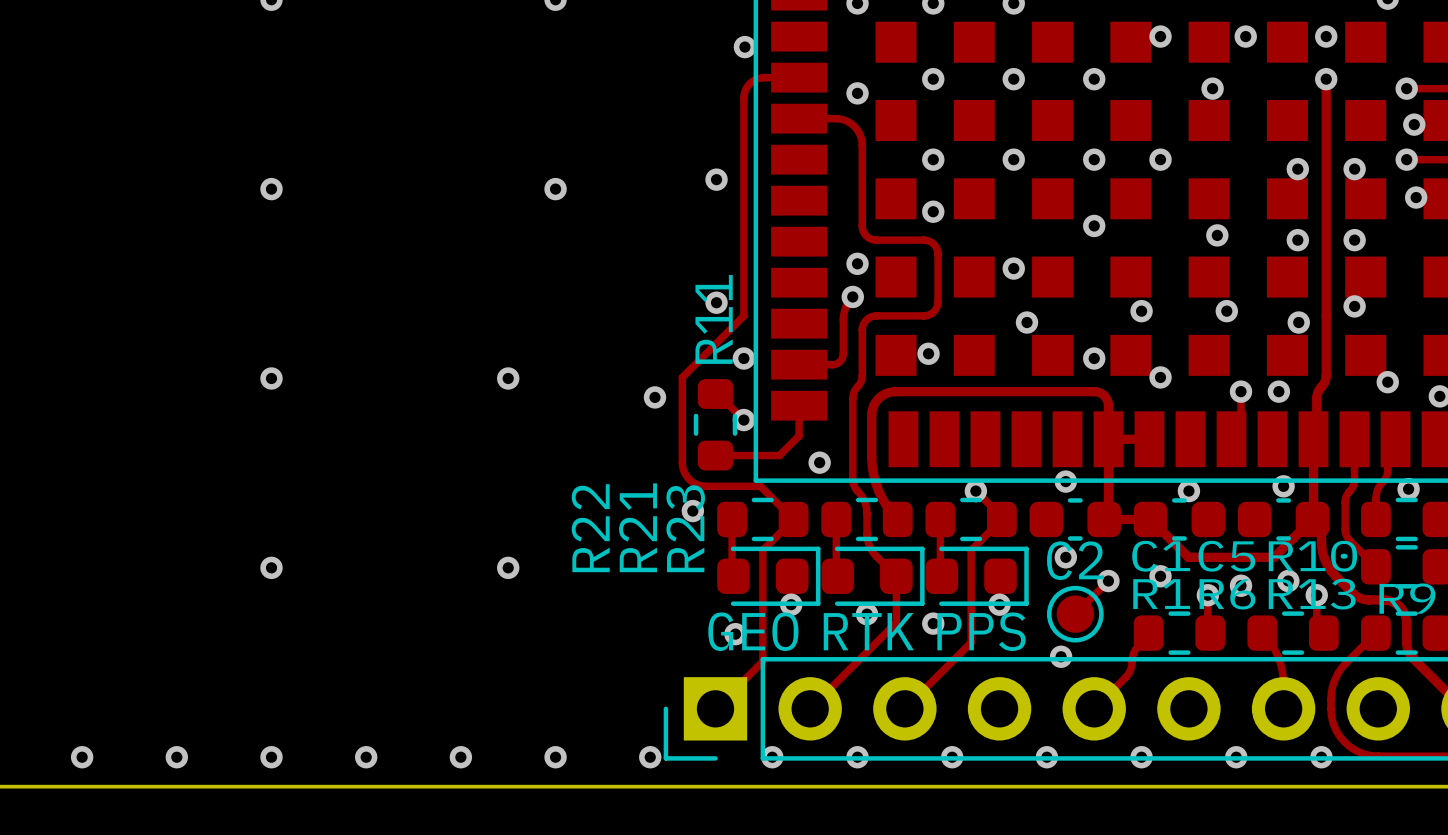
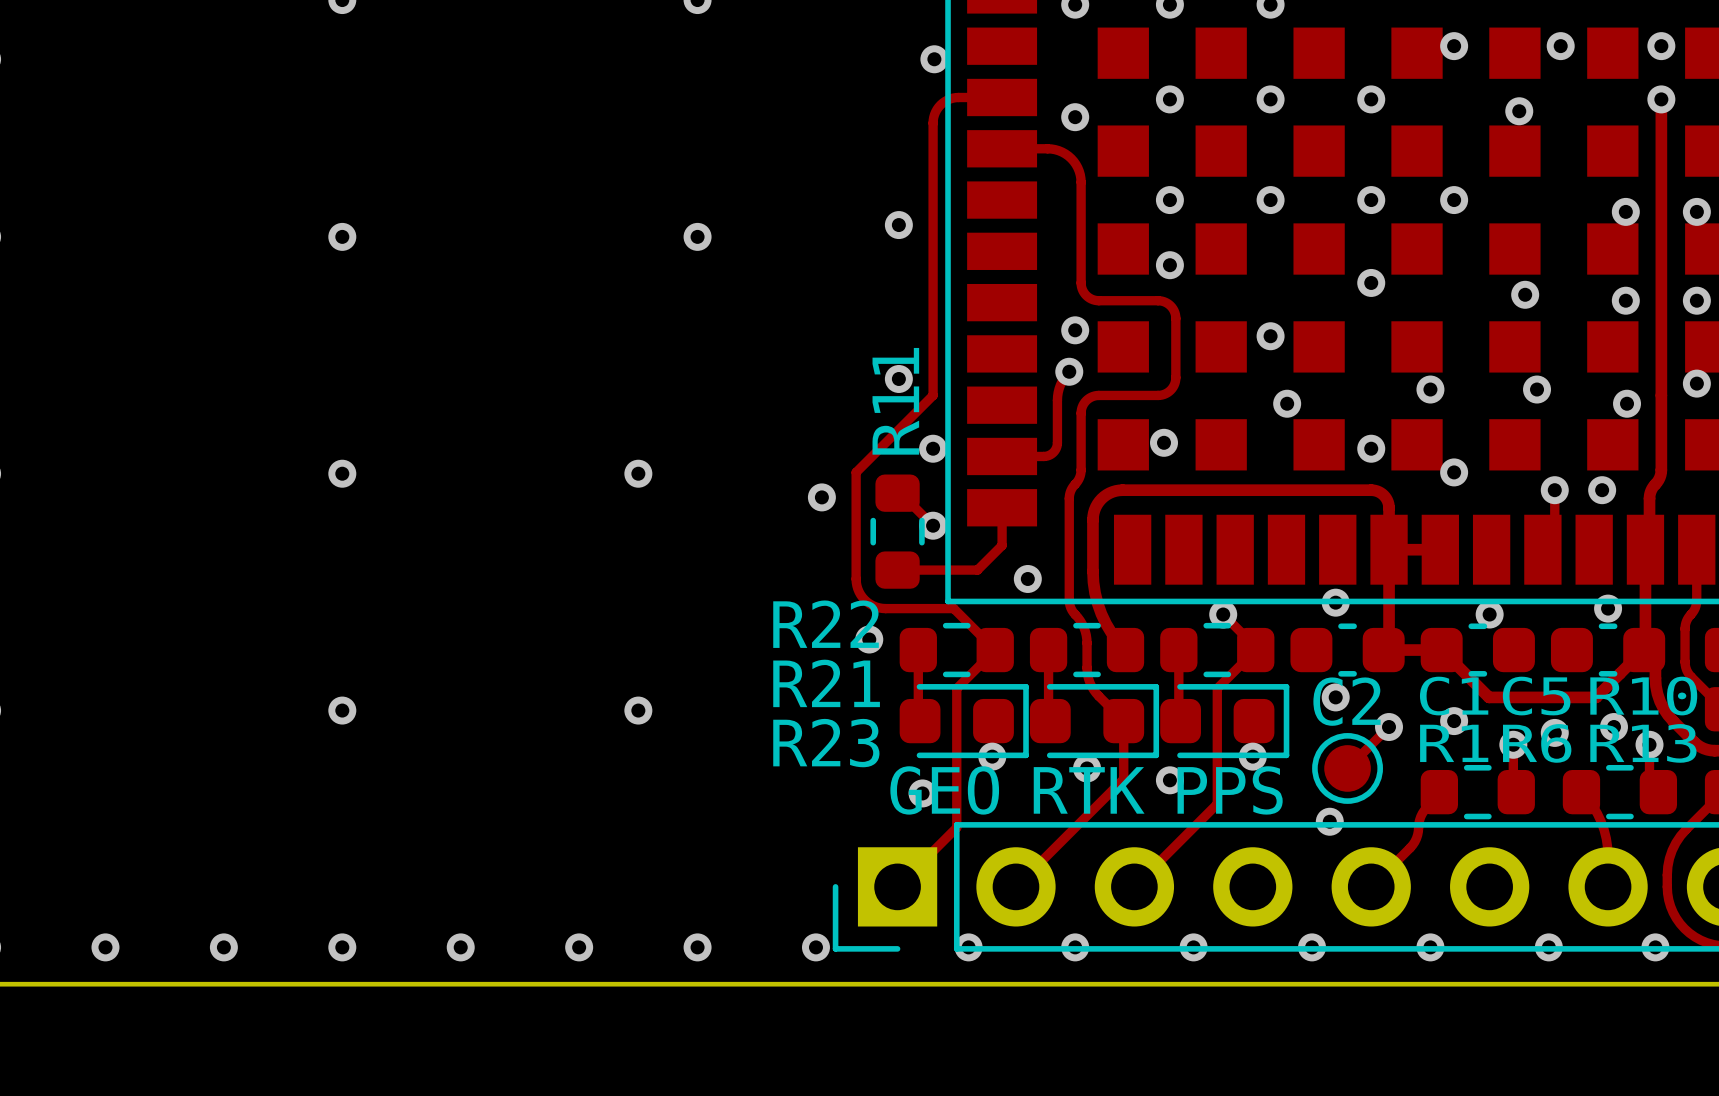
R21 name rotation: 0° (638, 527) -> 90° clockwise (826, 683)
R22 name rotation: 0° (590, 528) -> 90° clockwise (826, 624)
R23 name rotation: 0° (685, 528) -> 90° clockwise (826, 743)

